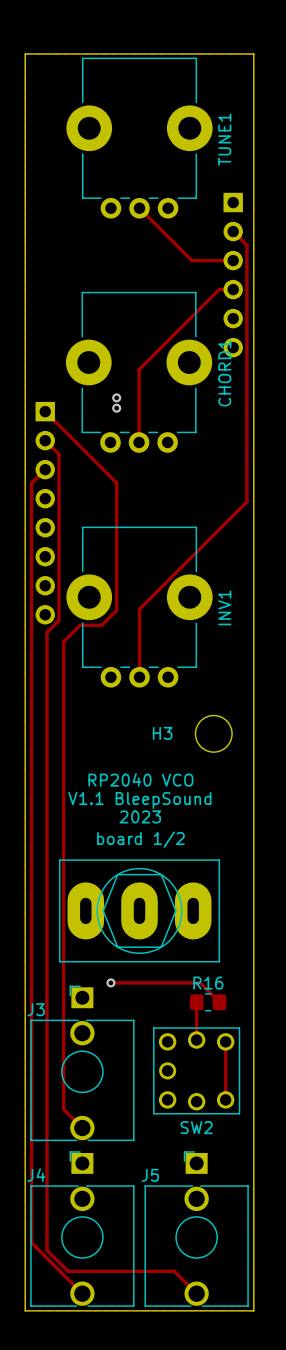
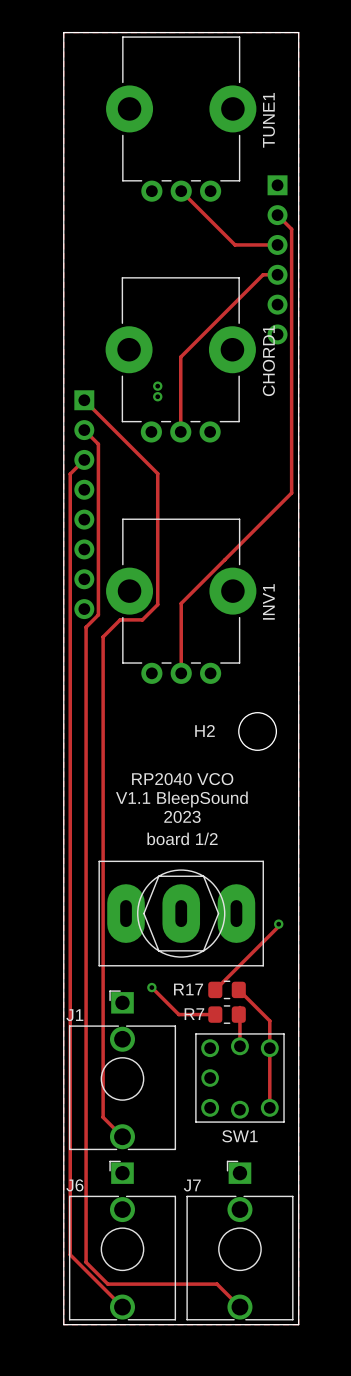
H3 name: H3 (162, 733) -> H2 (204, 730)
track: none -> (278, 924) (278, 926) (215, 989)
via: none -> (278, 924)
track: (110, 982) (200, 982) (219, 1002) -> (151, 987) (178, 1014) (215, 1014)
R17: none -> (227, 989)
track: none -> (238, 989) (269, 1020) (269, 1048)
R16: (208, 1002) -> none
J3 name: J3 (36, 1009) -> J1 (74, 1015)
R7: none -> (227, 1014)
SW2 name: SW2 (196, 1127) -> SW1 (239, 1136)
J4 name: J4 (36, 1175) -> J6 (74, 1185)
J5 name: J5 (150, 1175) -> J7 (192, 1185)

